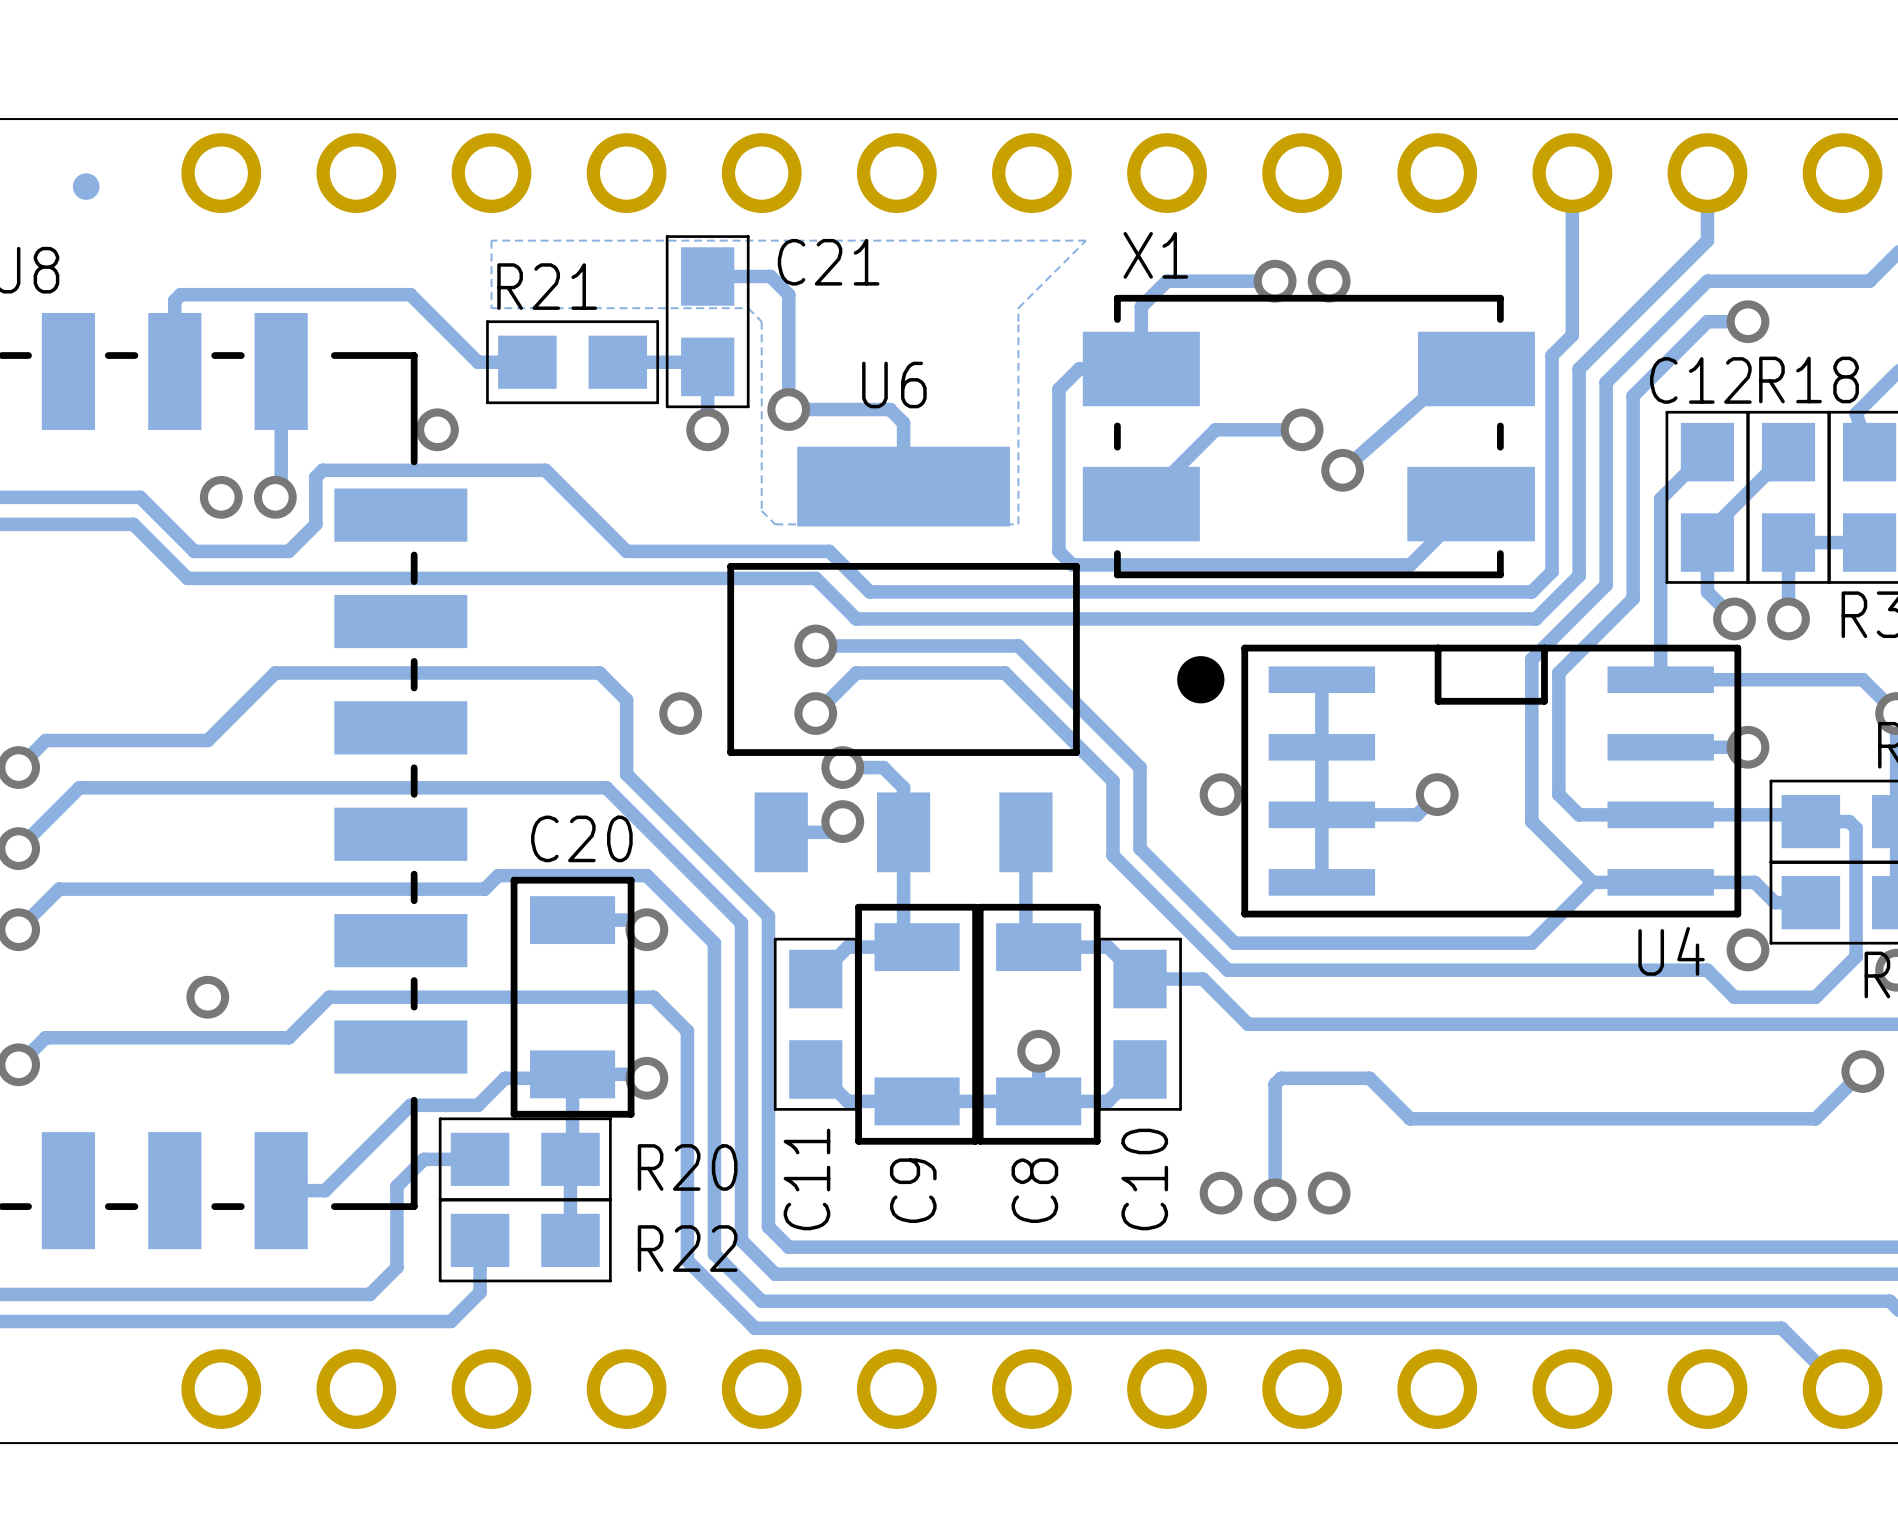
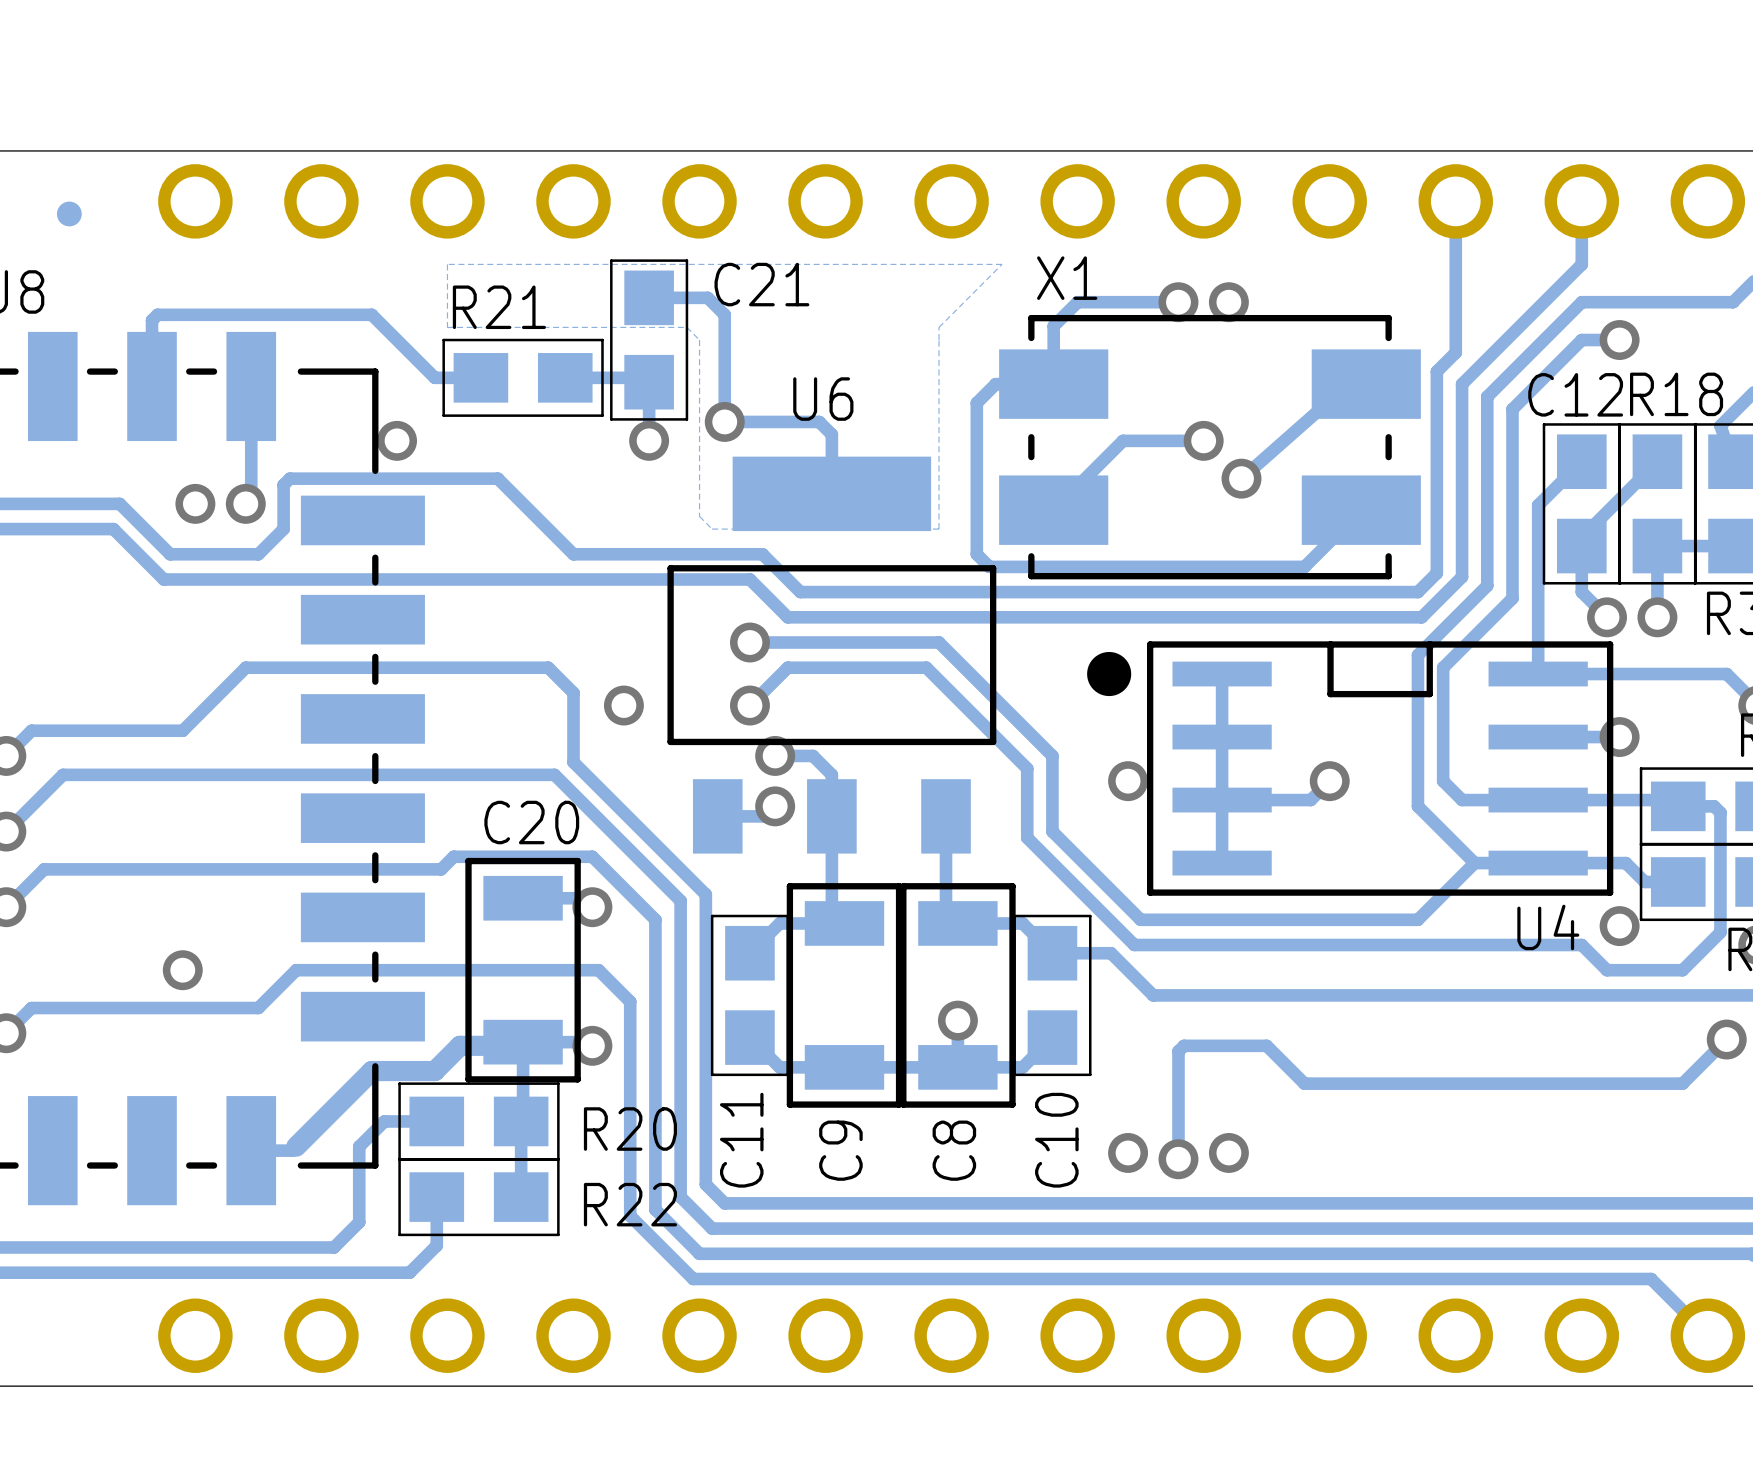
track width: thin (568, 1078) (505, 1078) (477, 1105) (410, 1105) (329, 1186) -> thick (519, 1045) (460, 1045) (434, 1071) (371, 1071) (296, 1146)

